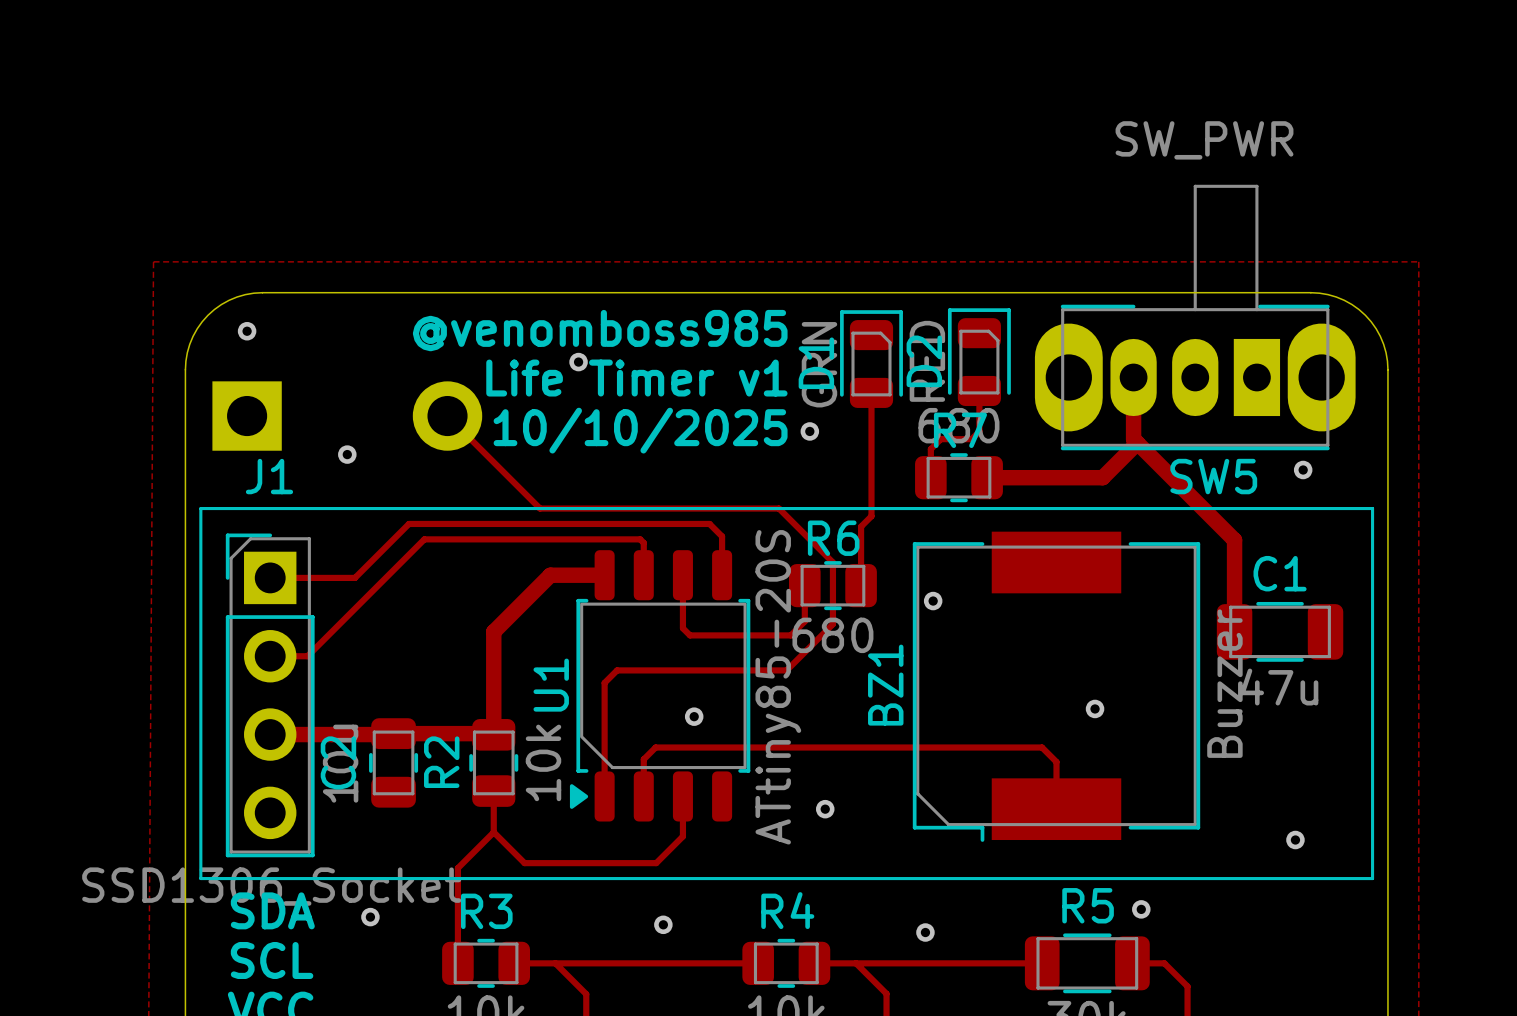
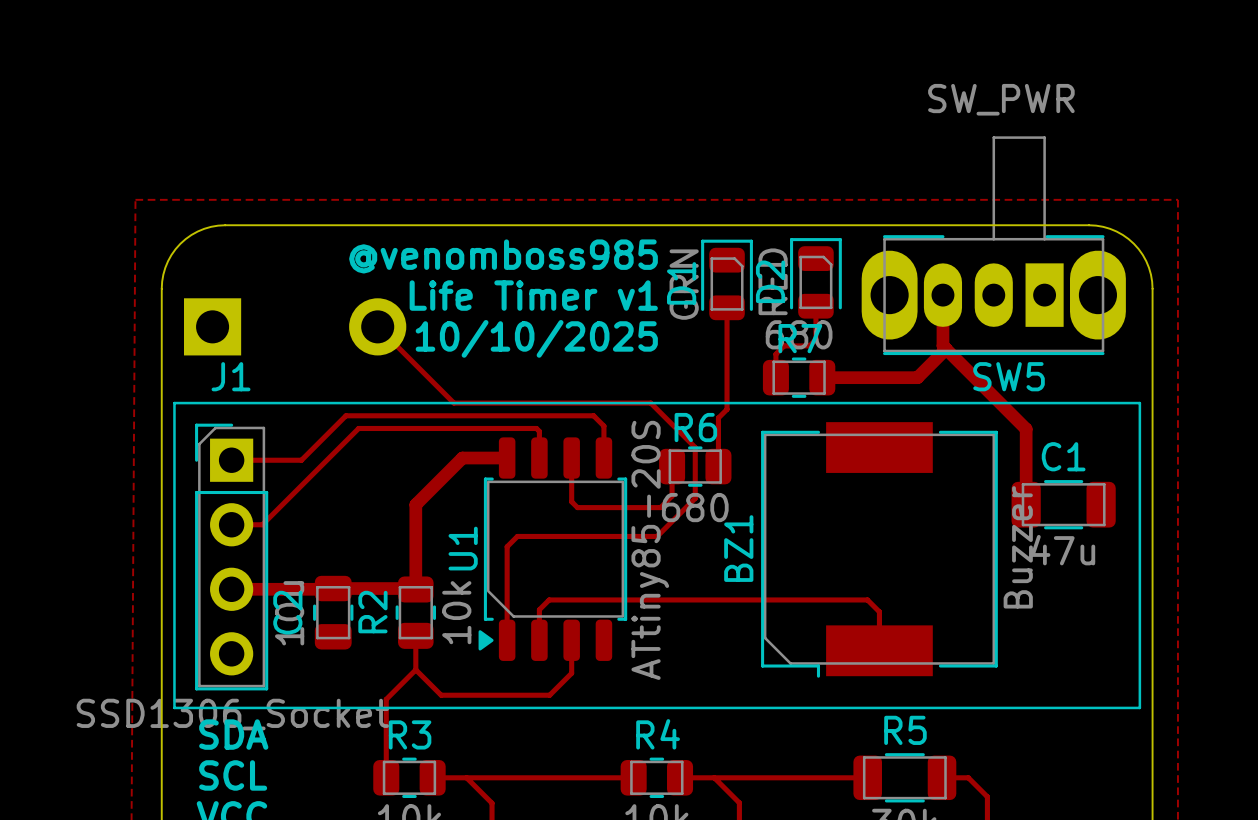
via: (247, 331) -> none
via: (578, 362) -> none
via: (809, 431) -> none
via: (347, 454) -> none
via: (1303, 469) -> none
via: (933, 601) -> none
via: (1095, 708) -> none
via: (694, 716) -> none
via: (825, 809) -> none
via: (1295, 840) -> none
via: (1141, 909) -> none
via: (370, 917) -> none
via: (663, 924) -> none
via: (925, 932) -> none

